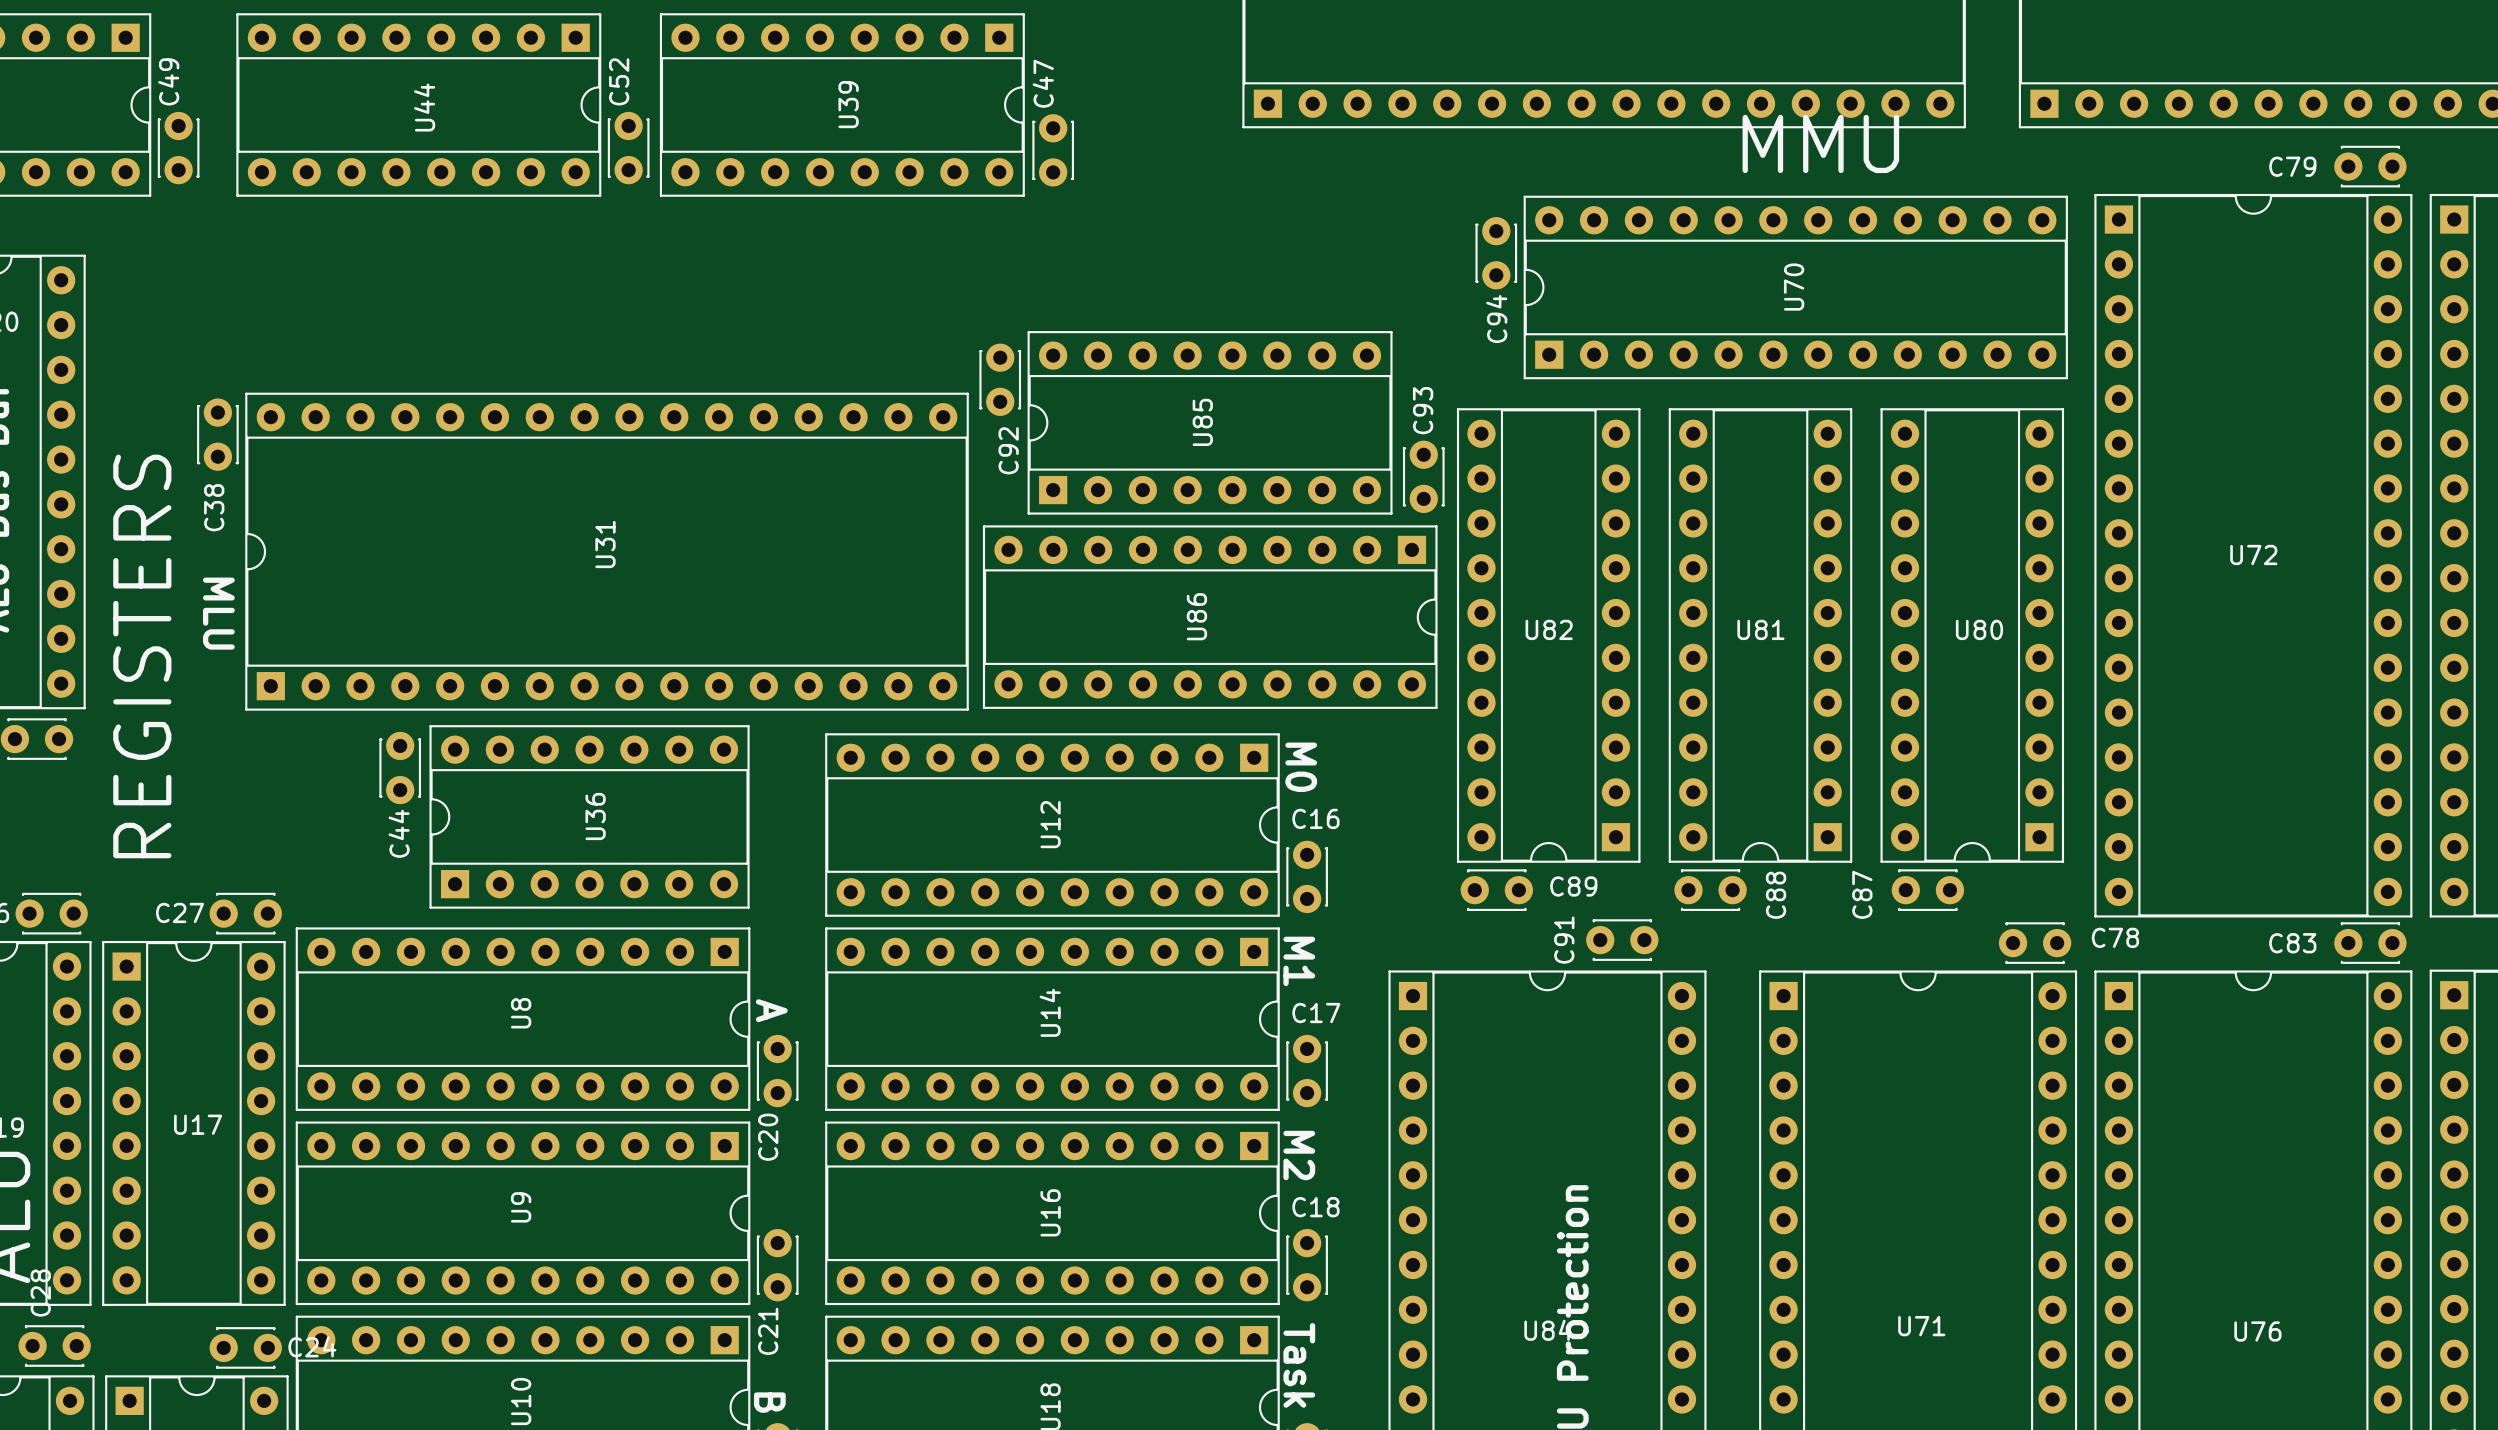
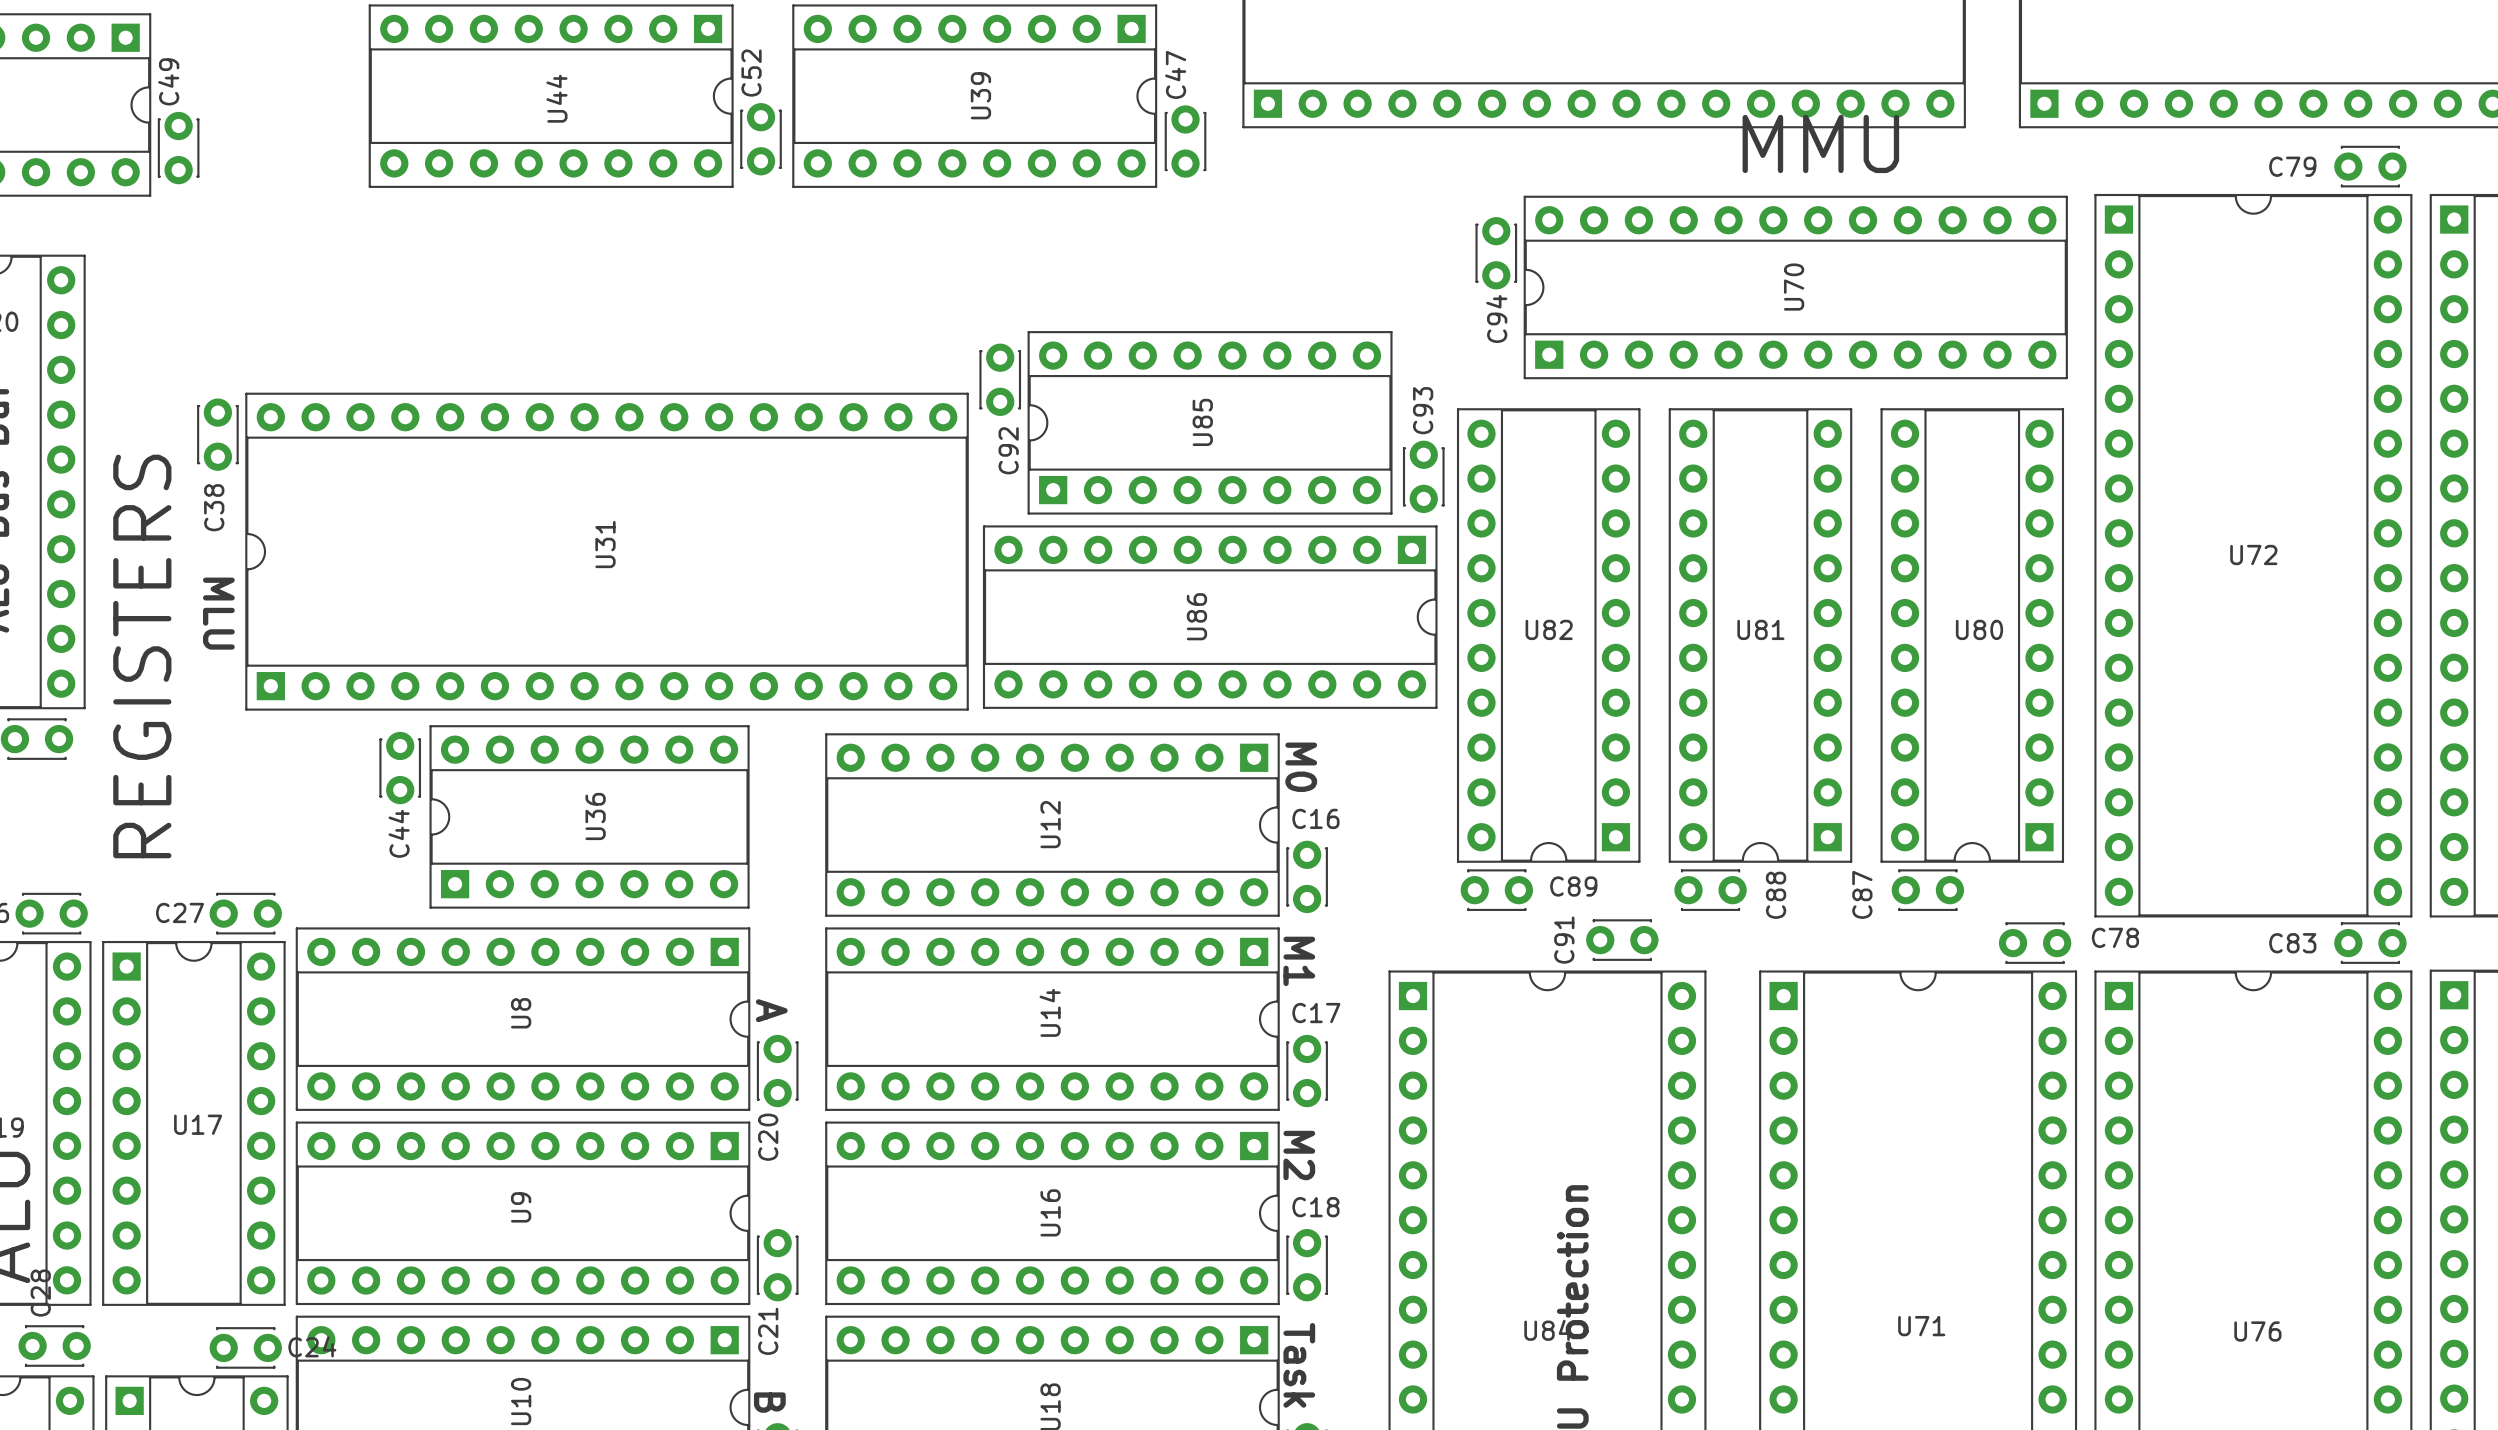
U44 position: (418, 105) -> (551, 96)
U39 position: (842, 105) -> (974, 96)
C52 position: (628, 148) -> (761, 139)
C47 position: (1053, 150) -> (1185, 141)

